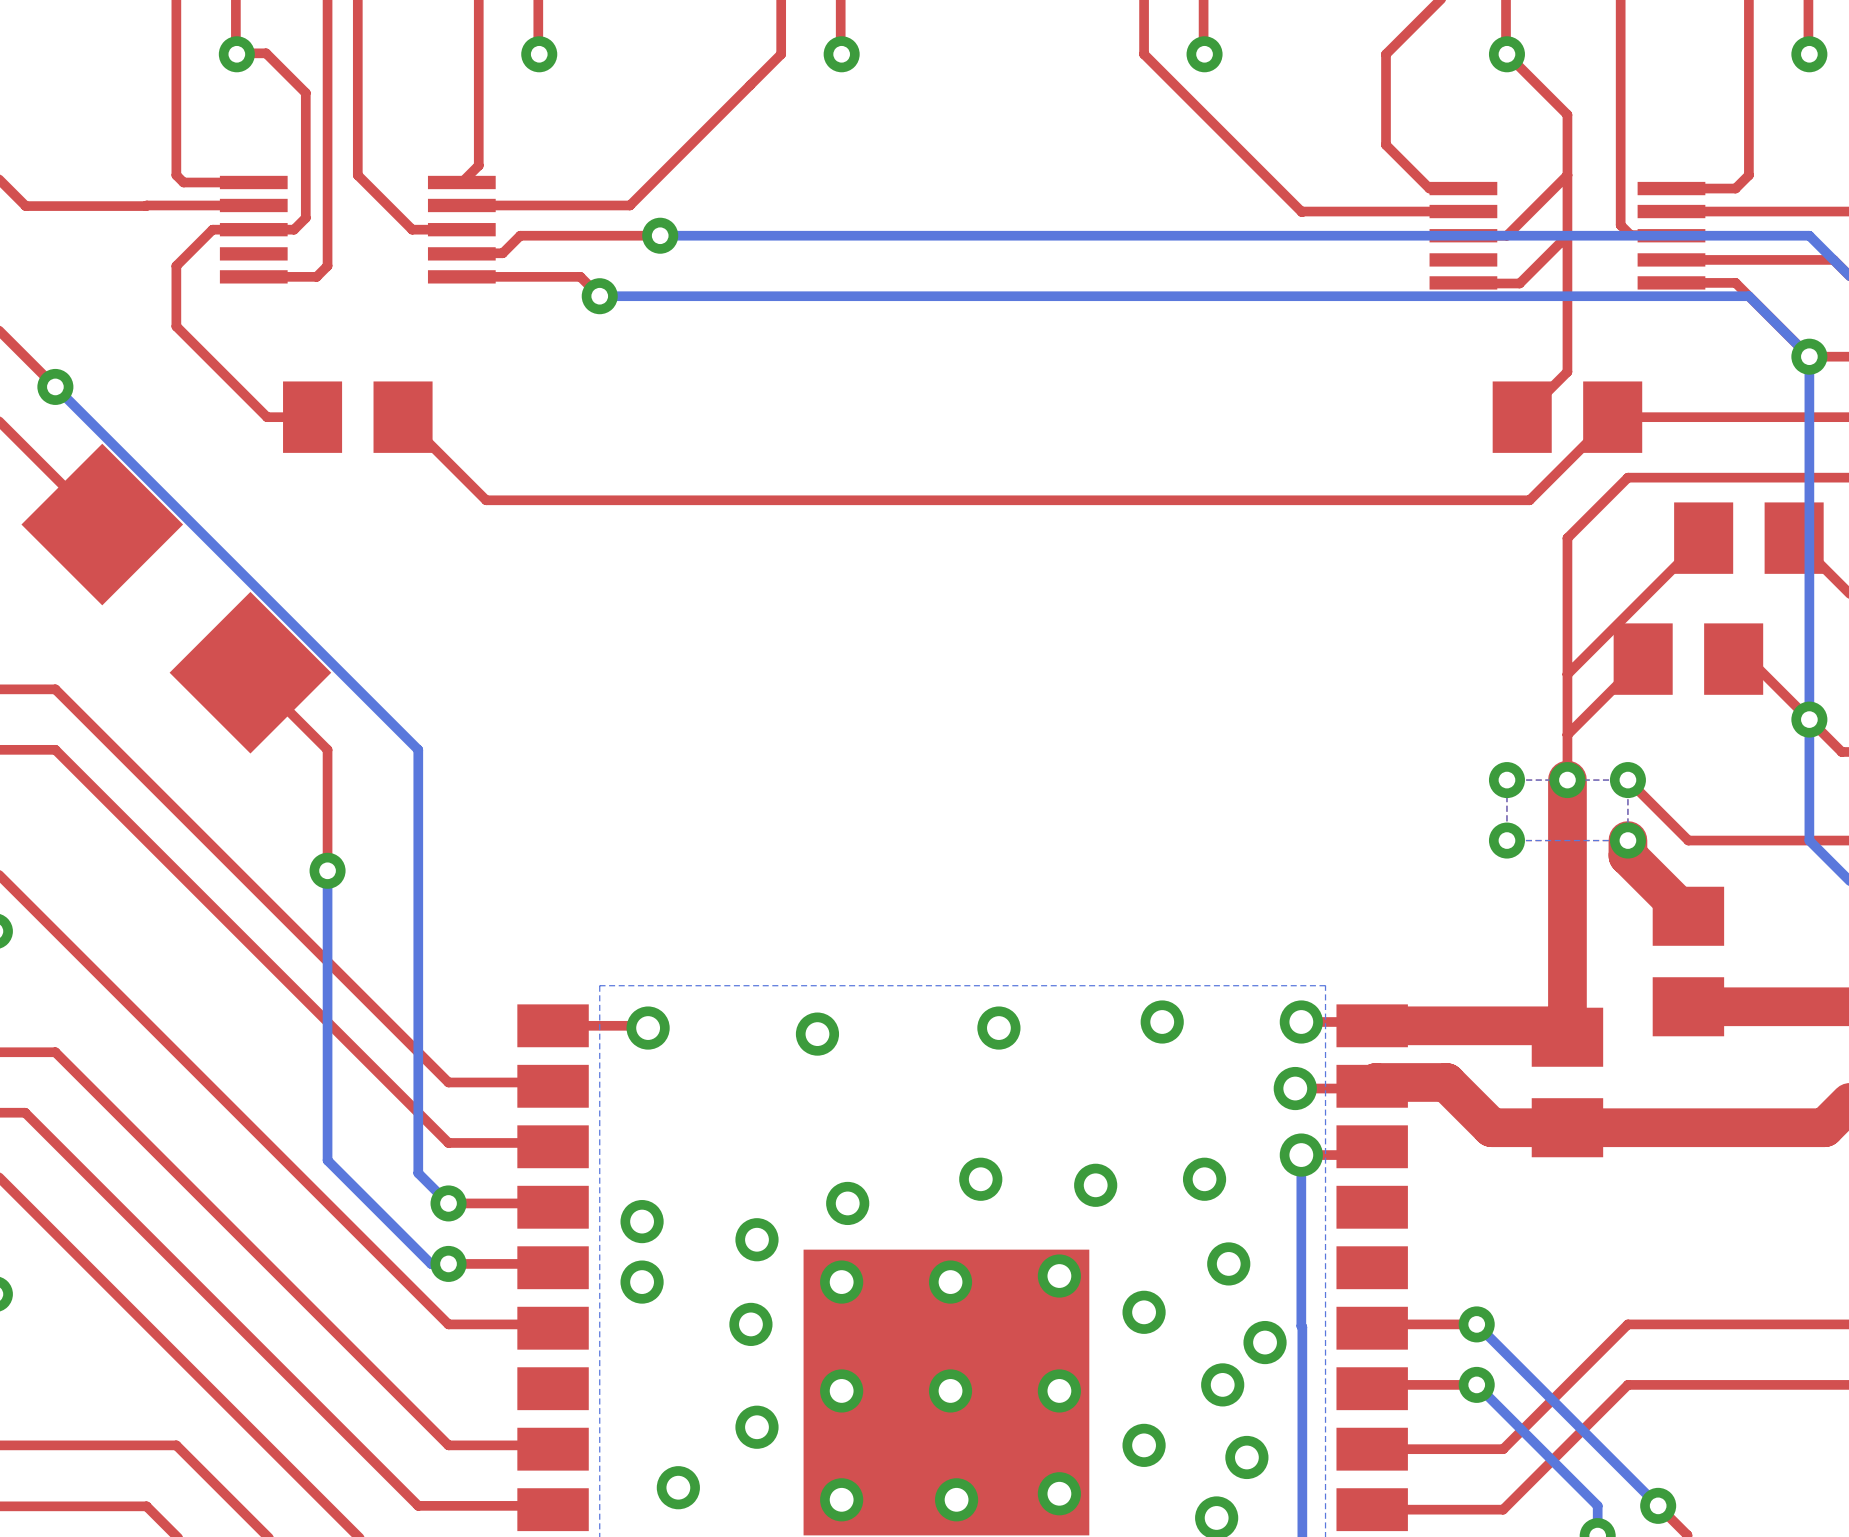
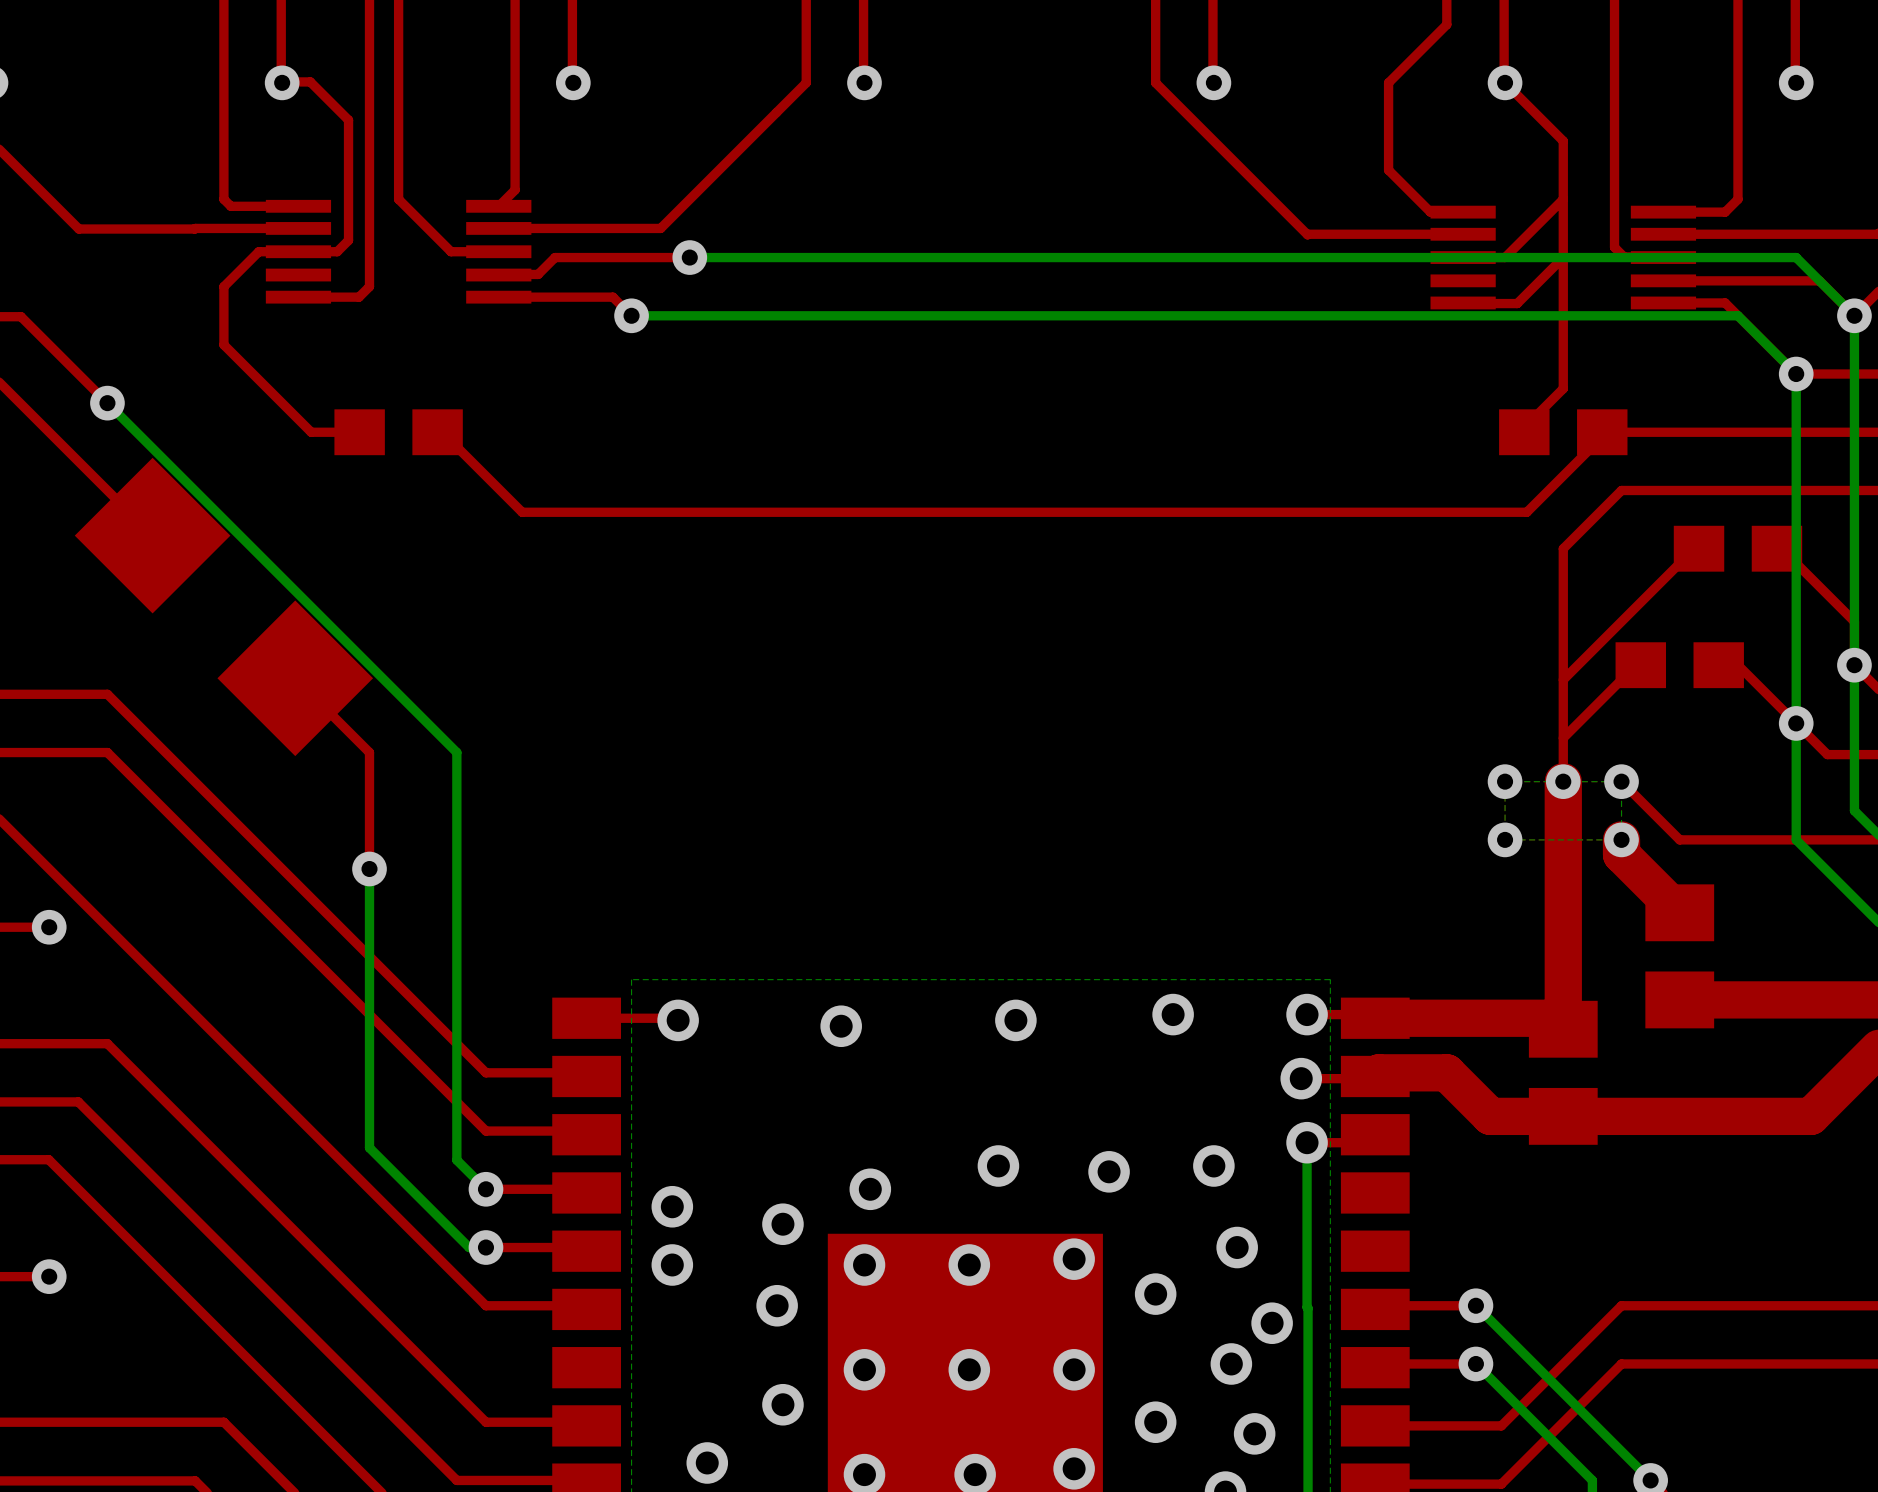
part footprint: [283, 381, 433, 453] -> [334, 409, 463, 456]
part footprint: [1492, 381, 1643, 453] -> [1499, 409, 1628, 456]
part footprint: [1674, 502, 1824, 574] -> [1673, 525, 1803, 572]
part footprint: [1613, 623, 1764, 695] -> [1615, 642, 1744, 689]

